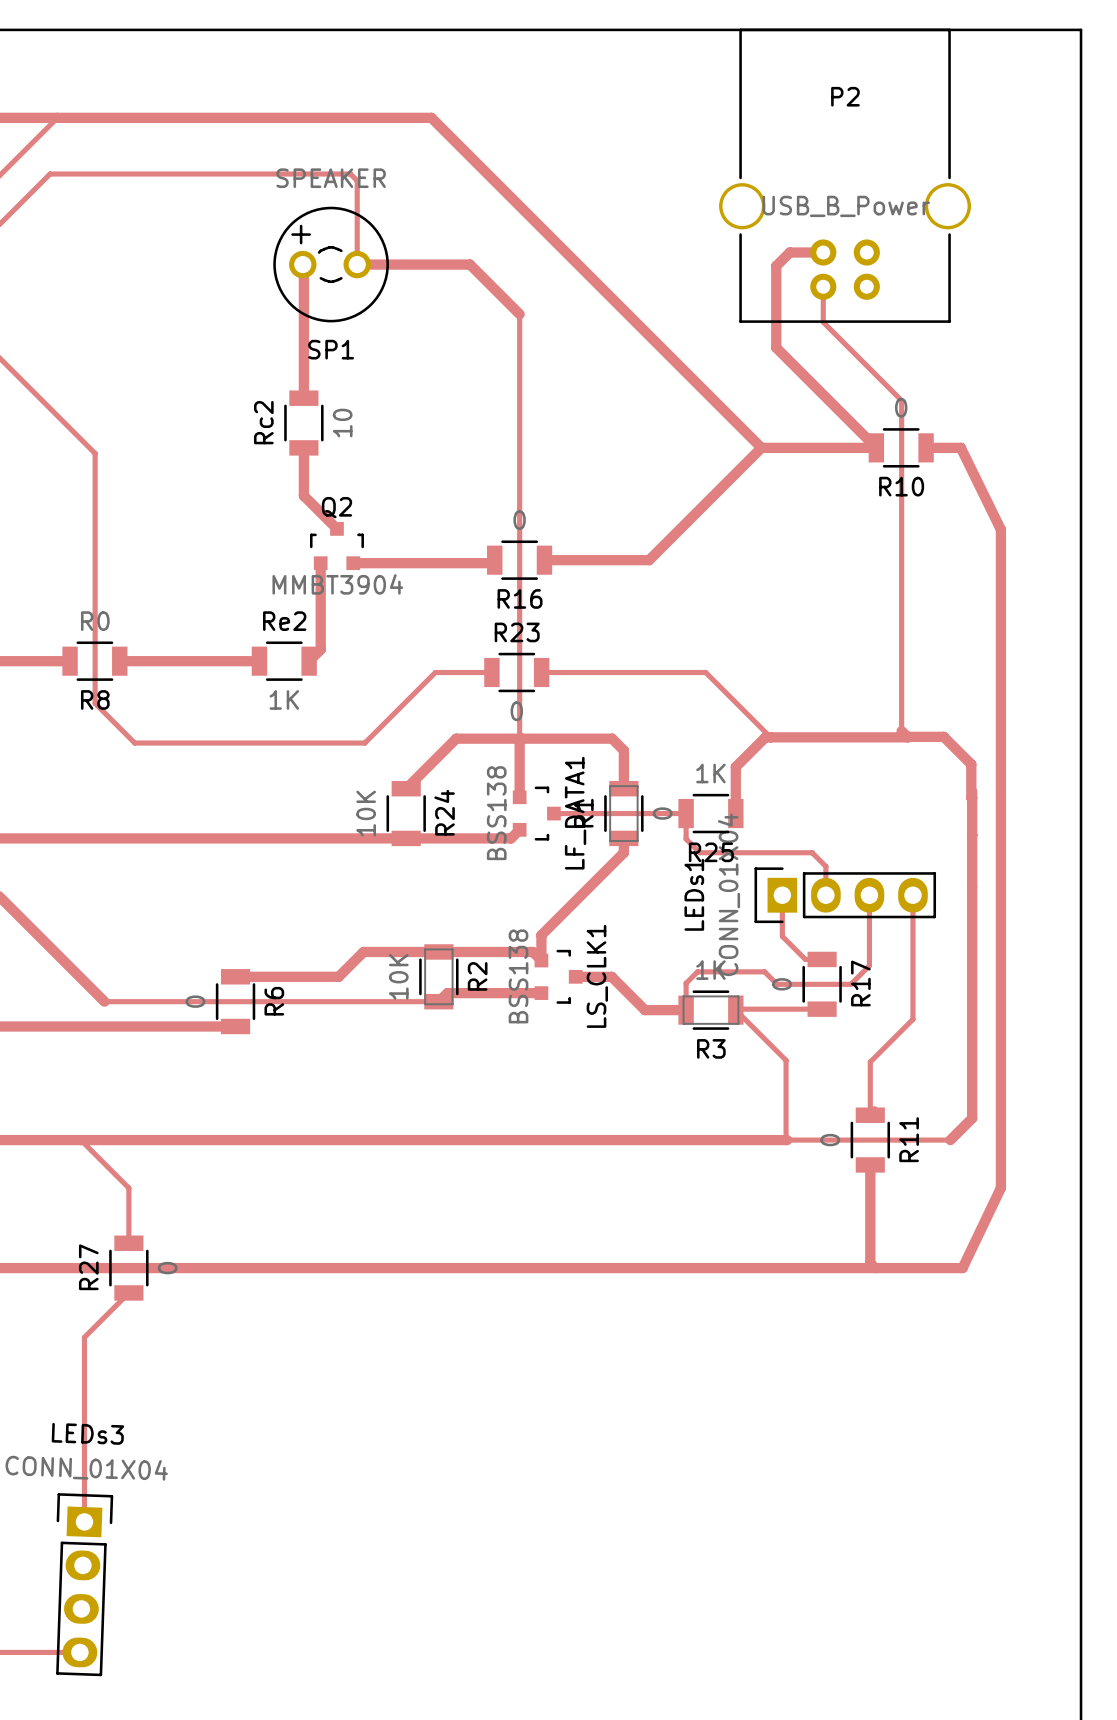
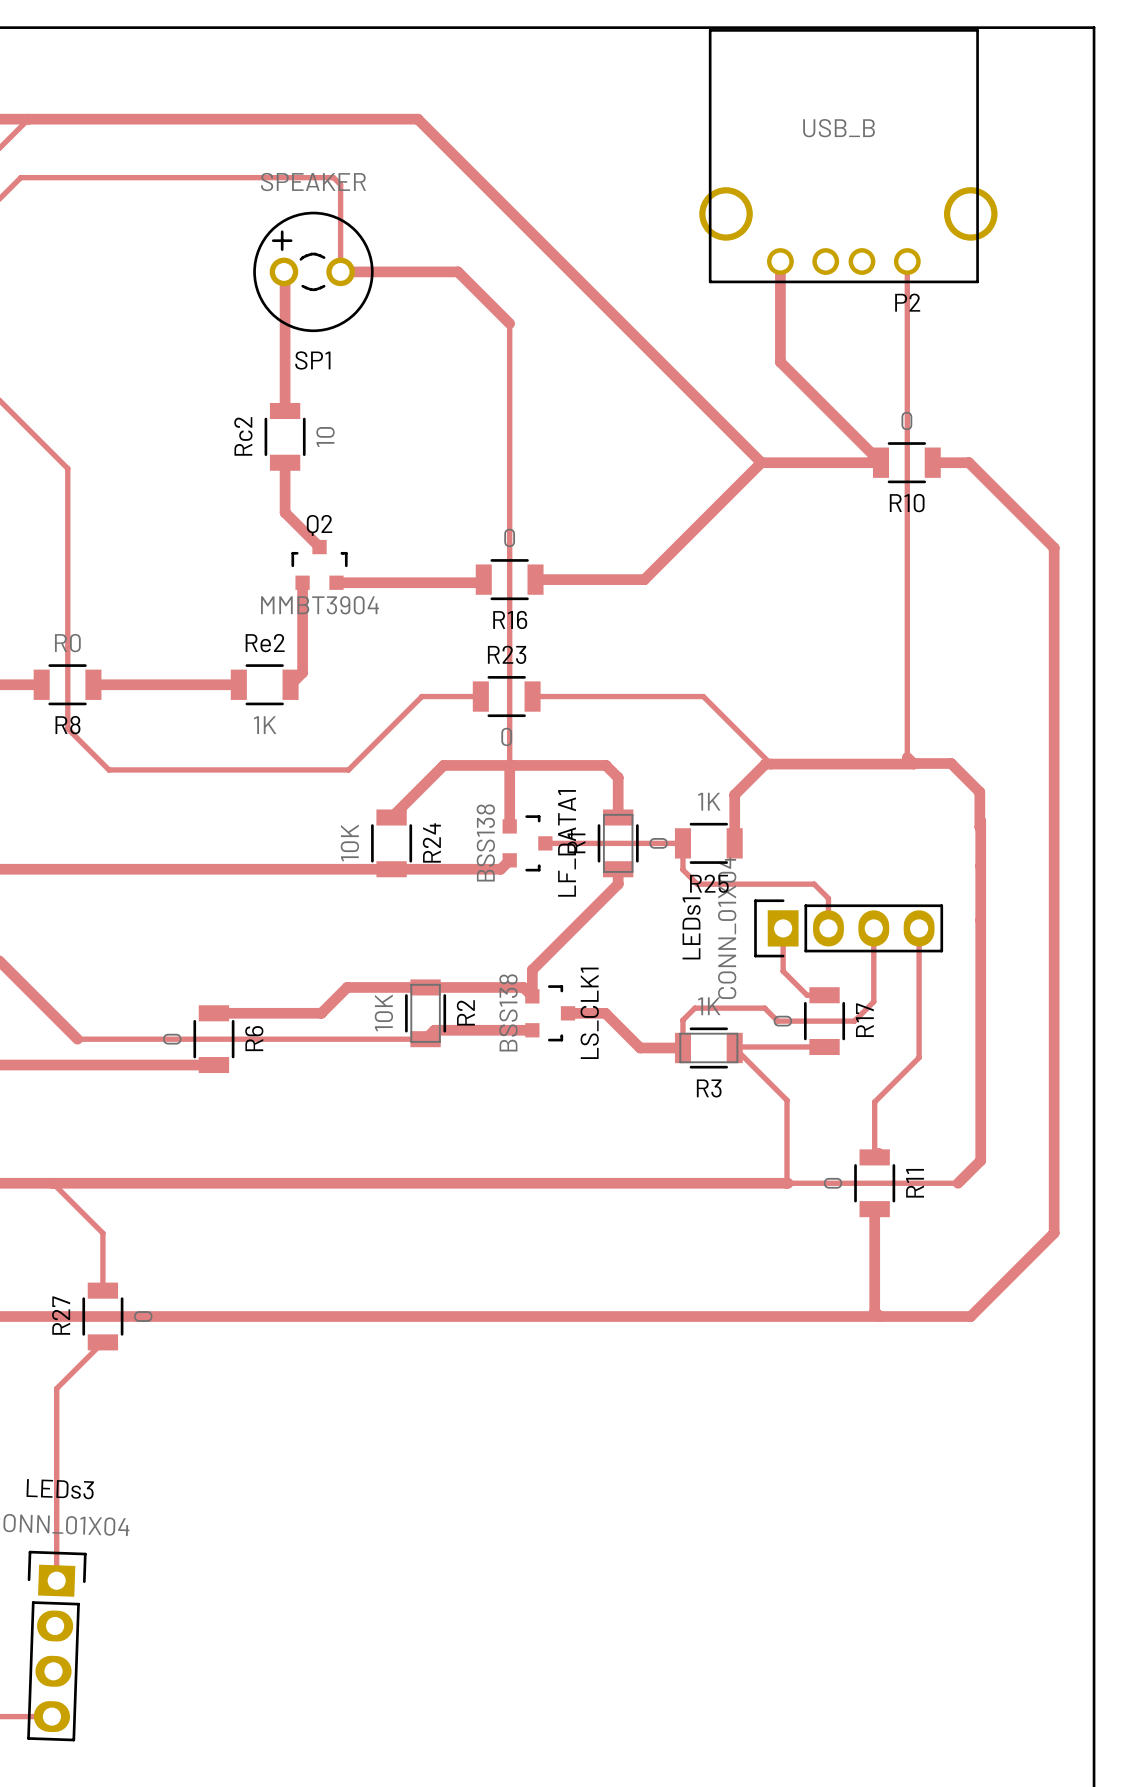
P2 footprint: [719, 28, 972, 323] -> [699, 29, 998, 284]
P2 name position: P2 (845, 96) -> P2 (907, 302)
P2 value: USB_B_Power (846, 206) -> USB_B (839, 128)
top track: (823, 252) (789, 252) (776, 266) (776, 347) (779, 351) -> (780, 261) (780, 362)
top track: (823, 286) (823, 322) (901, 400) -> (907, 261) (907, 413)
top track: (960, 447) (1000, 529) (1000, 1187) (962, 1268) -> (968, 462) (1054, 547) (1054, 1233) (970, 1316)

